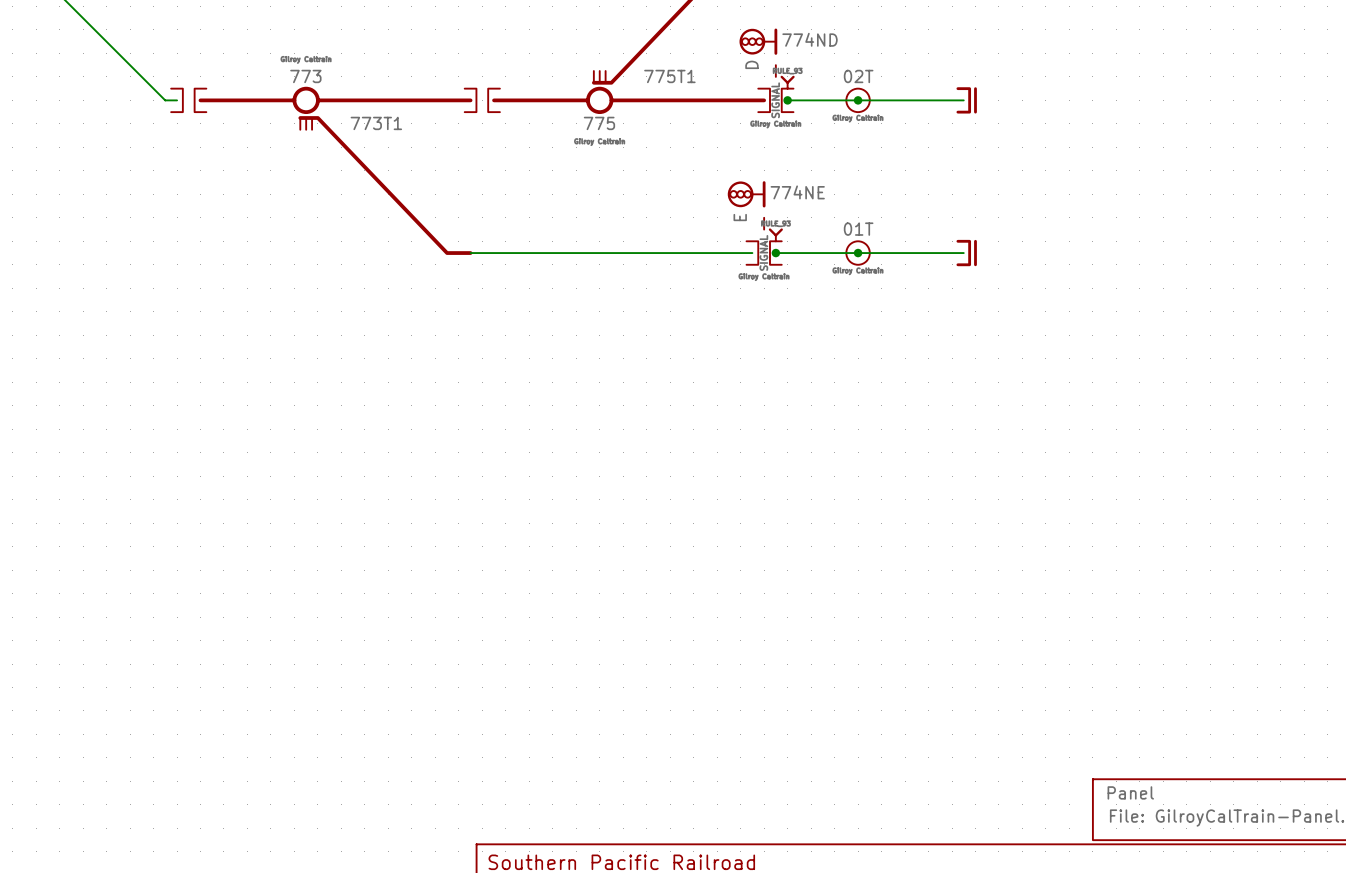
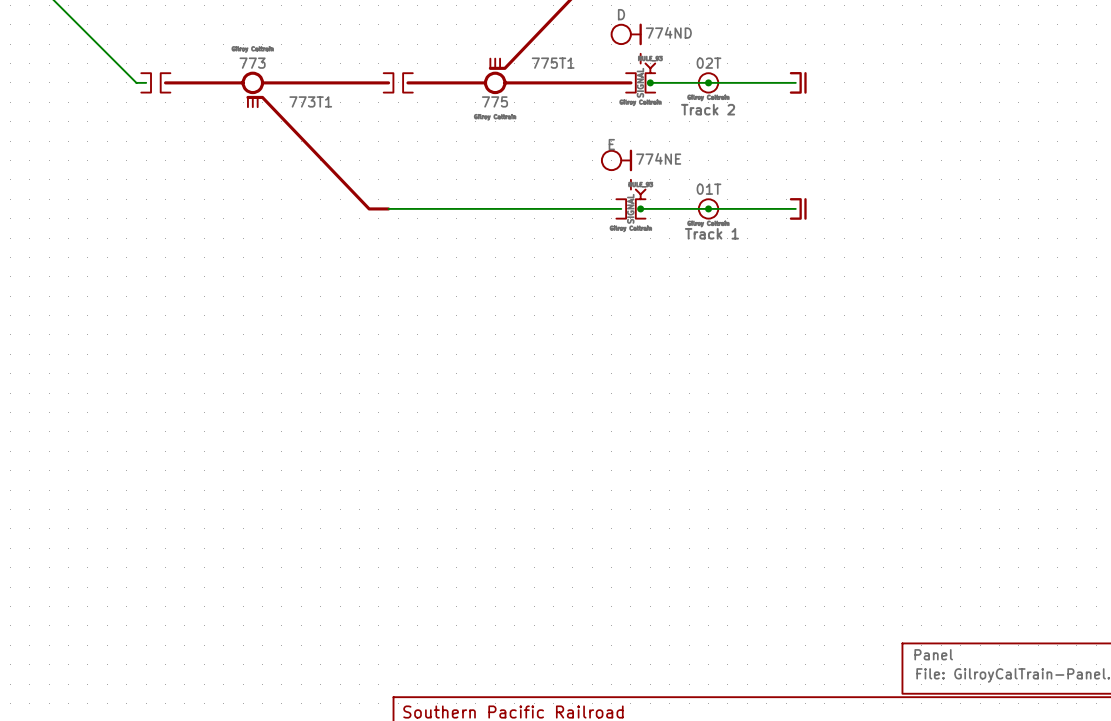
part symbol: [739, 28, 766, 55] -> [610, 23, 632, 46]
part value position: D (751, 64) -> D (621, 14)
part value: none -> Track 2 (708, 109)
part symbol: [727, 181, 754, 208] -> [600, 149, 623, 172]
part value position: E (740, 217) -> E (611, 144)
part value: none -> Track 1 (711, 233)

